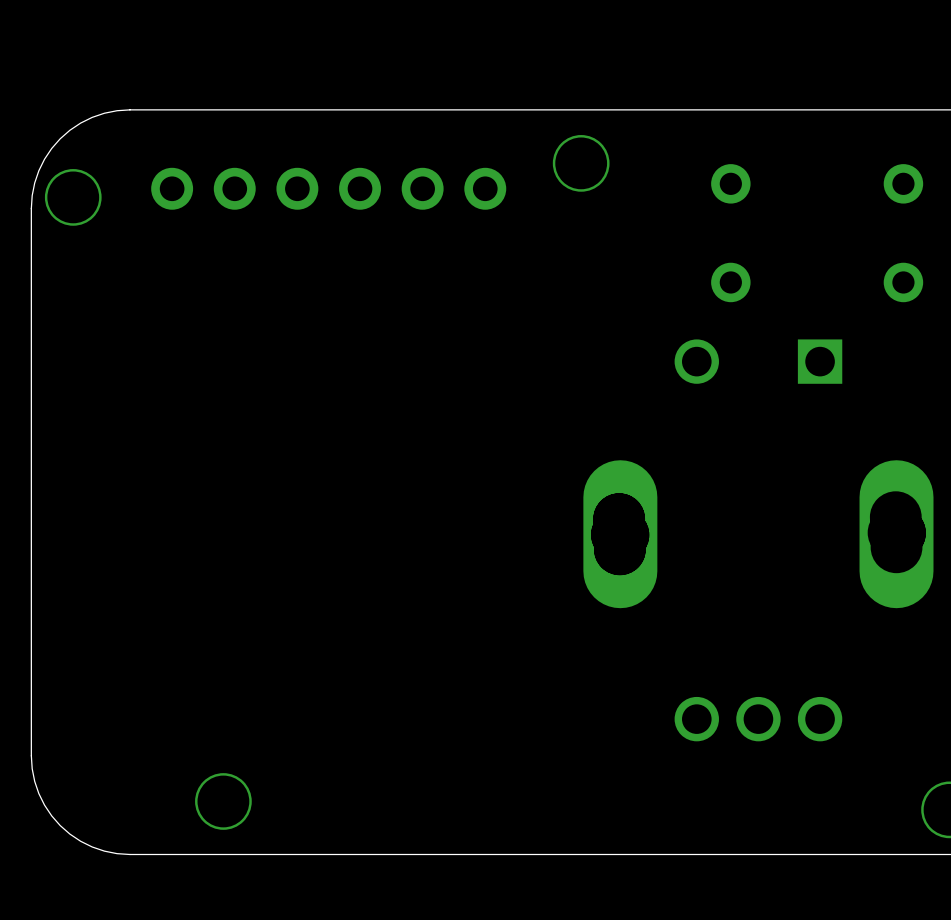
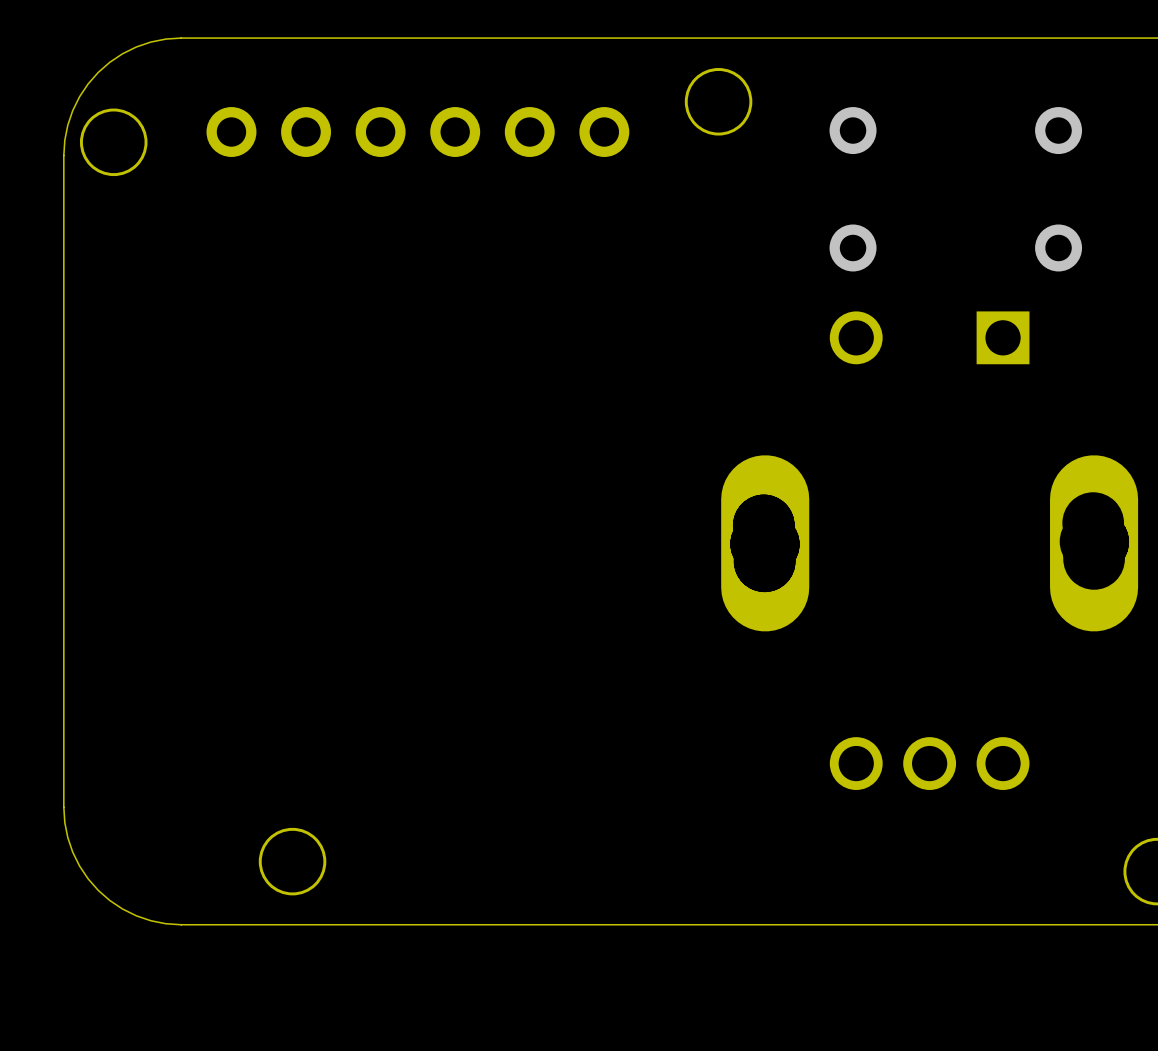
via position: (730, 183) -> (853, 130)
via position: (903, 183) -> (1058, 130)
via position: (730, 282) -> (853, 247)
via position: (903, 282) -> (1058, 247)

